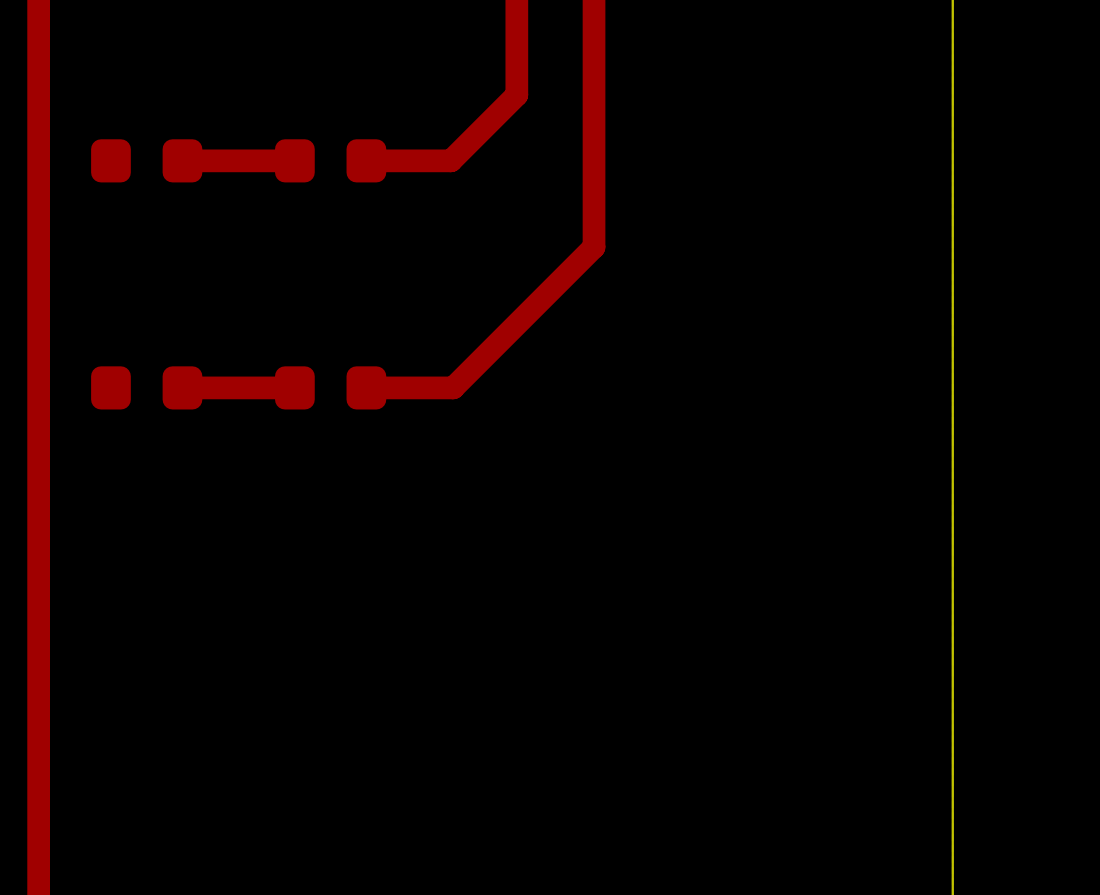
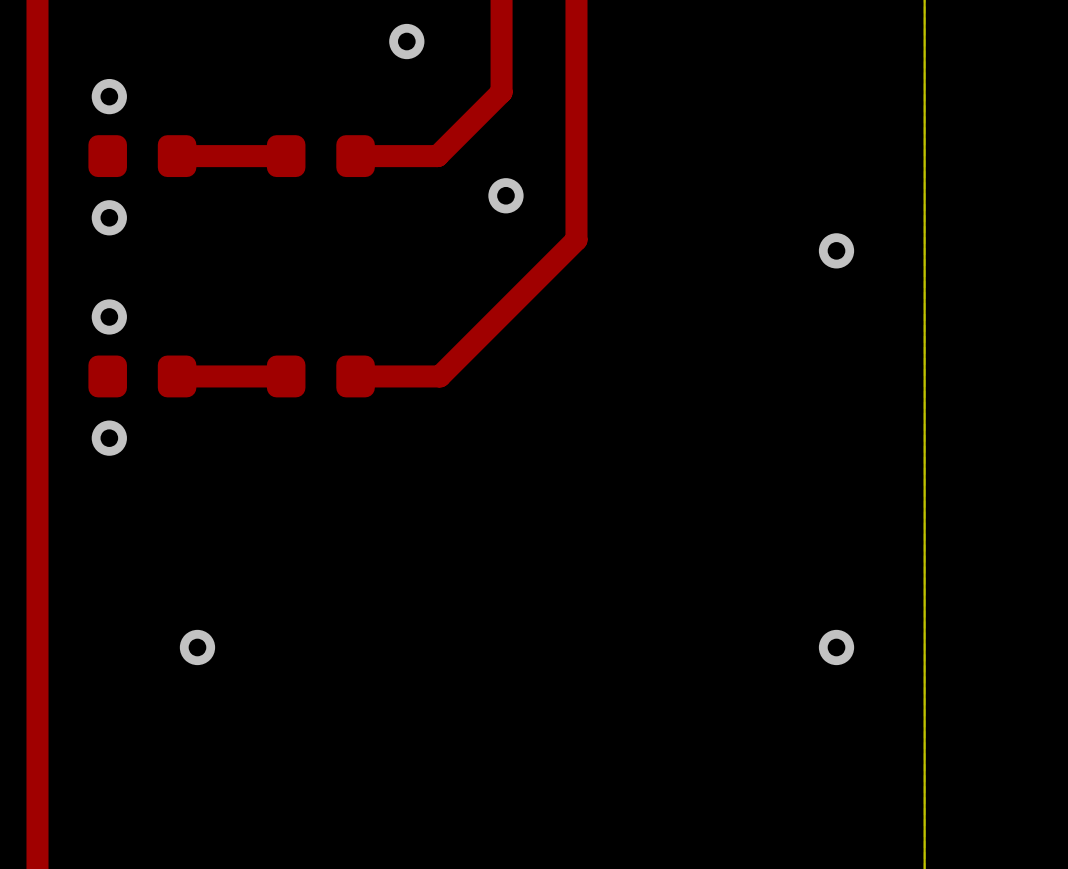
via: none -> (406, 41)
via: none -> (109, 96)
via: none -> (505, 195)
via: none -> (109, 217)
via: none -> (836, 250)
via: none -> (109, 316)
via: none -> (109, 438)
via: none -> (197, 647)
via: none -> (836, 647)

